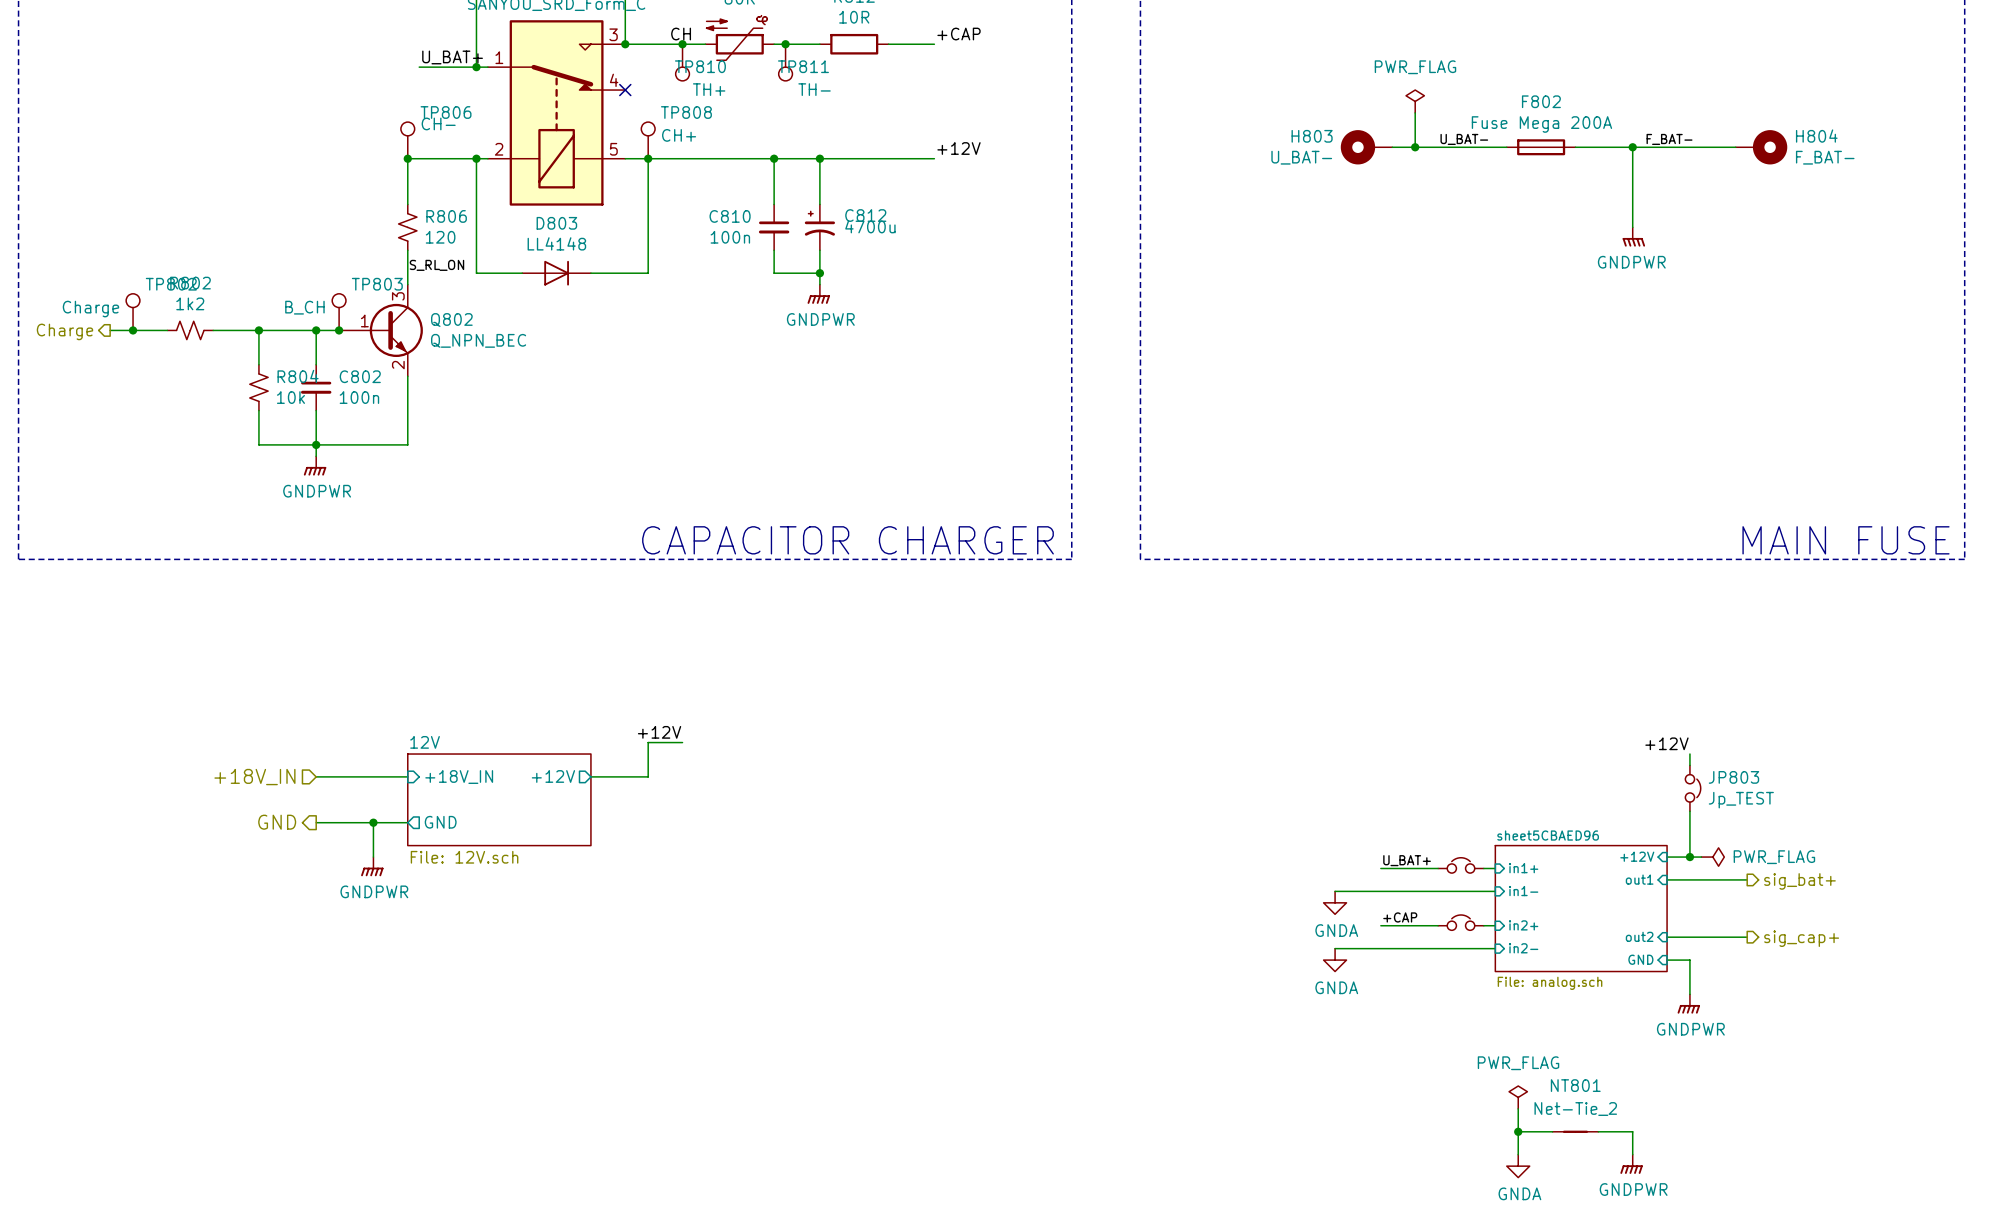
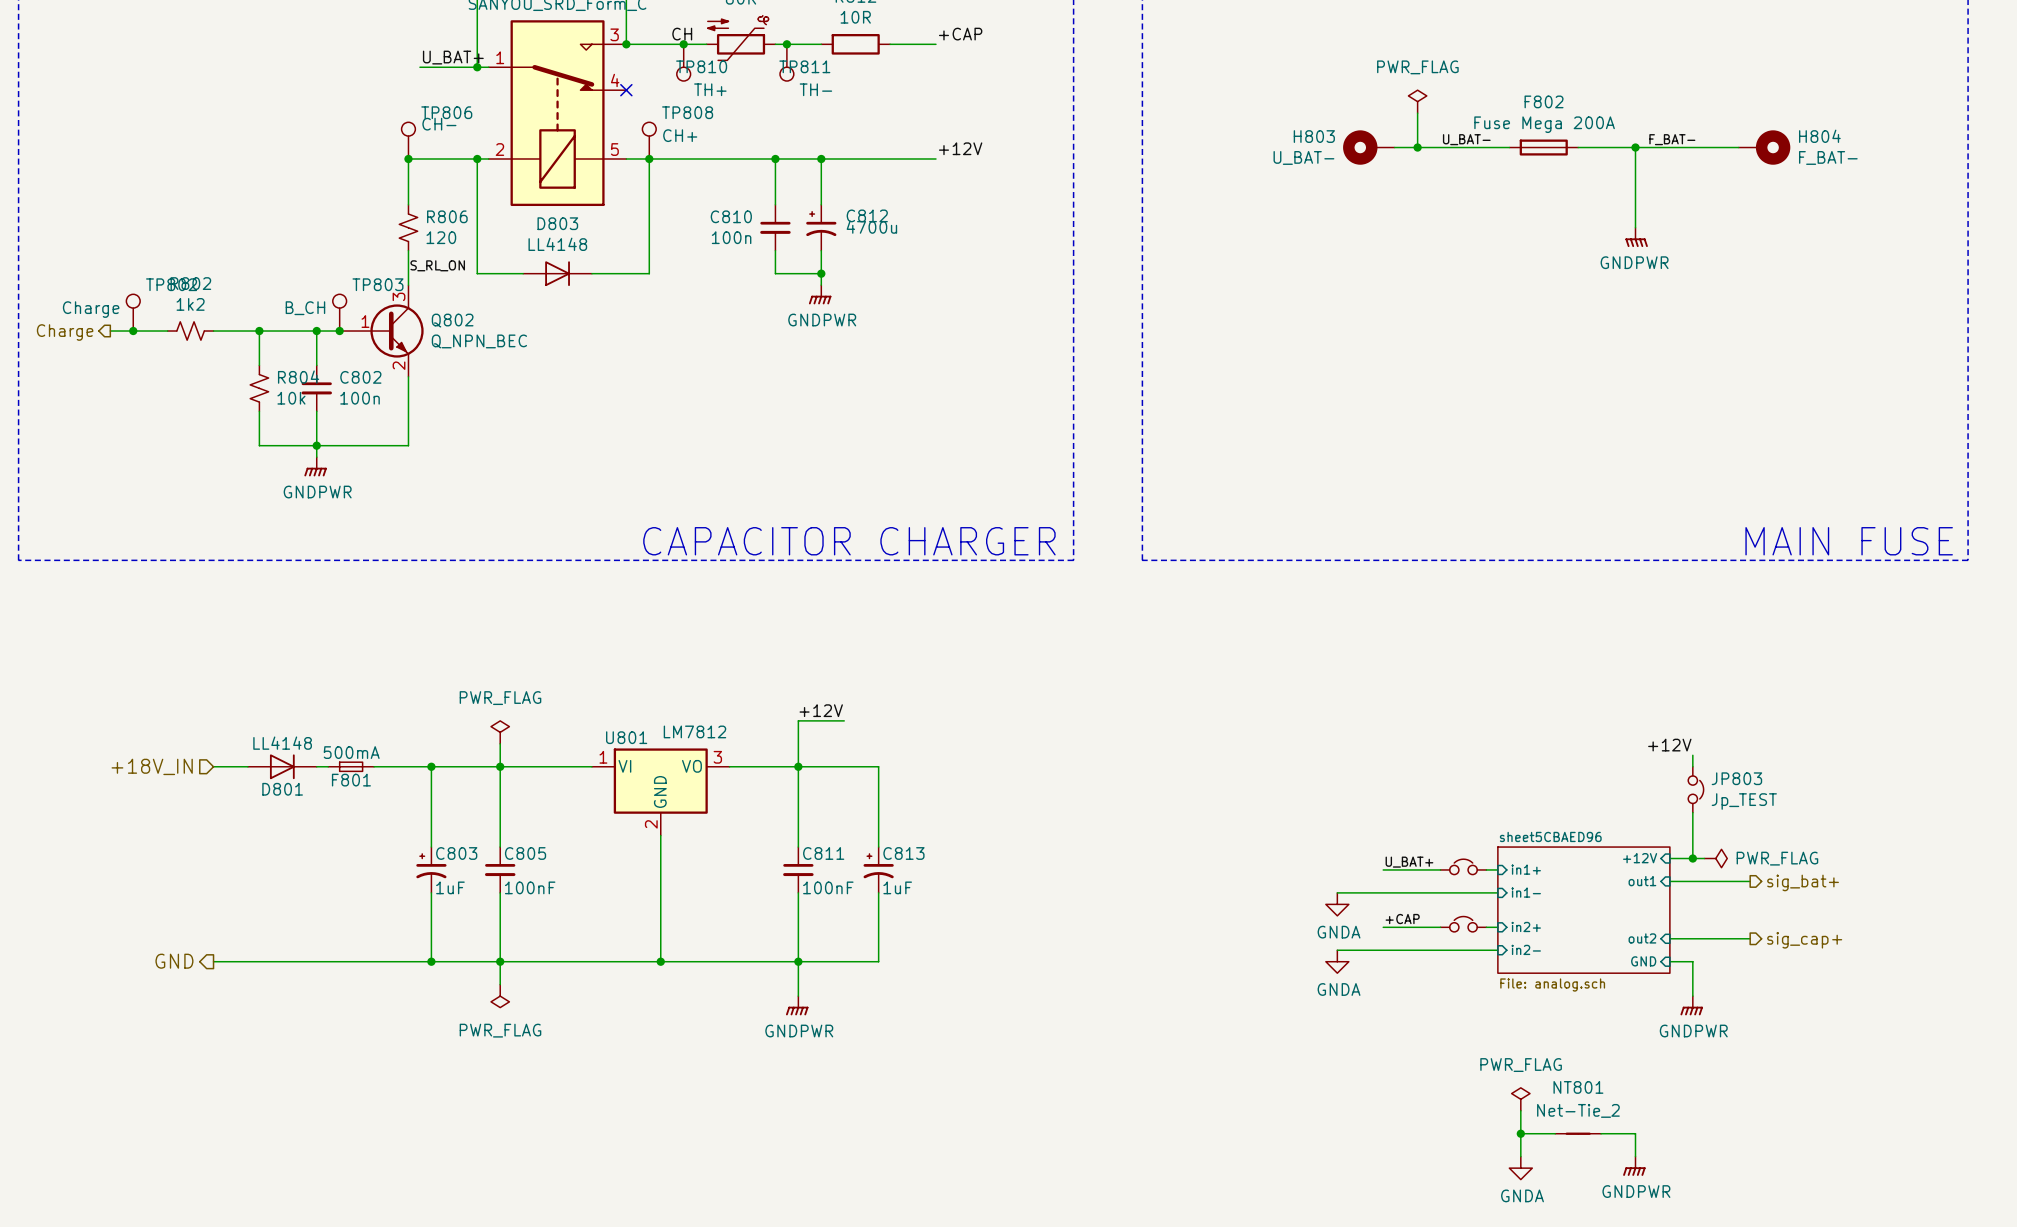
wire: none -> (844, 720) (798, 720) (798, 847)
power symbol: none -> PWR_FLAG (500, 732)
label position: +12V (659, 732) -> +12V (821, 710)
wire: none -> (500, 743) (500, 847)
wire: (682, 742) (648, 742) (648, 776) (590, 776) -> none
wire: none -> (213, 766) (247, 766)
D801: none -> LL4148 (282, 766)
wire: none -> (316, 766) (328, 766)
F801: none -> 500mA (351, 766)
wire: none -> (374, 766) (591, 766)
wire: none -> (431, 766) (431, 847)
junction: none -> (431, 766)
junction: none -> (500, 766)
wire: none -> (729, 766) (878, 766) (878, 847)
junction: none -> (798, 766)
wire: (316, 776) (407, 776) -> none
sheet pin: +12V (553, 776) -> none
hierarchical label position: +18V_IN (254, 777) -> +18V_IN (152, 766)
sheet pin: +18V_IN (459, 777) -> none
U801: none -> LM7812 (660, 792)
sheet 12V: File: 12V.sch (499, 799) -> none
hierarchical label position: GND (277, 822) -> GND (174, 961)
wire: (316, 822) (407, 822) -> none
wire: (373, 822) (373, 857) -> none
junction: (373, 822) -> none
sheet pin: GND (440, 822) -> none
wire: none -> (660, 835) (660, 961)
power symbol: GNDPWR (372, 866) -> none
C803: none -> 1uF (431, 869)
C805: none -> 100nF (500, 869)
C811: none -> 100nF (798, 869)
C813: none -> 1uF (878, 869)
wire: none -> (431, 892) (431, 961)
wire: none -> (500, 892) (500, 984)
wire: none -> (798, 892) (798, 996)
wire: none -> (878, 892) (878, 961) (213, 961)
junction: none -> (431, 961)
junction: none -> (500, 961)
junction: none -> (660, 961)
junction: none -> (798, 961)
power symbol: none -> PWR_FLAG (500, 996)
power symbol: none -> GNDPWR (797, 1005)

